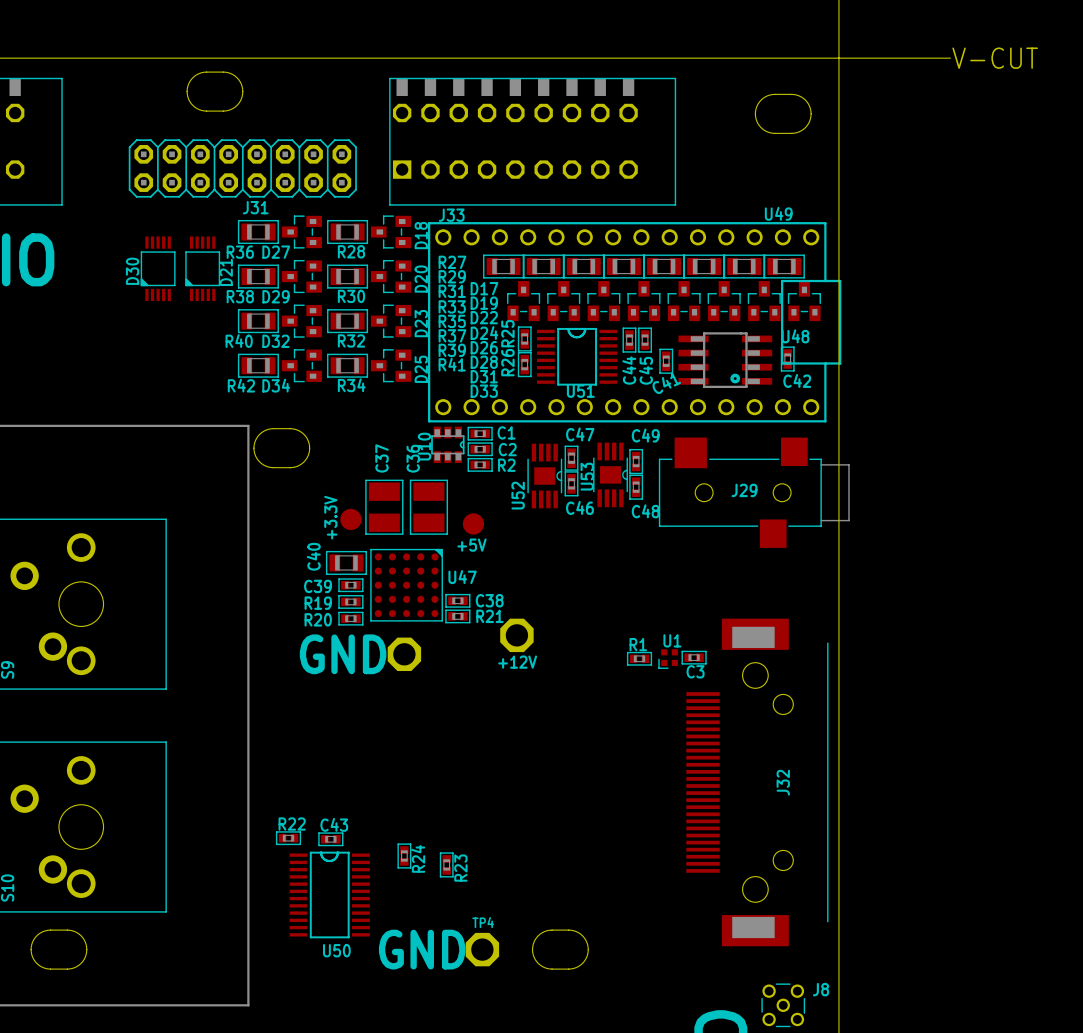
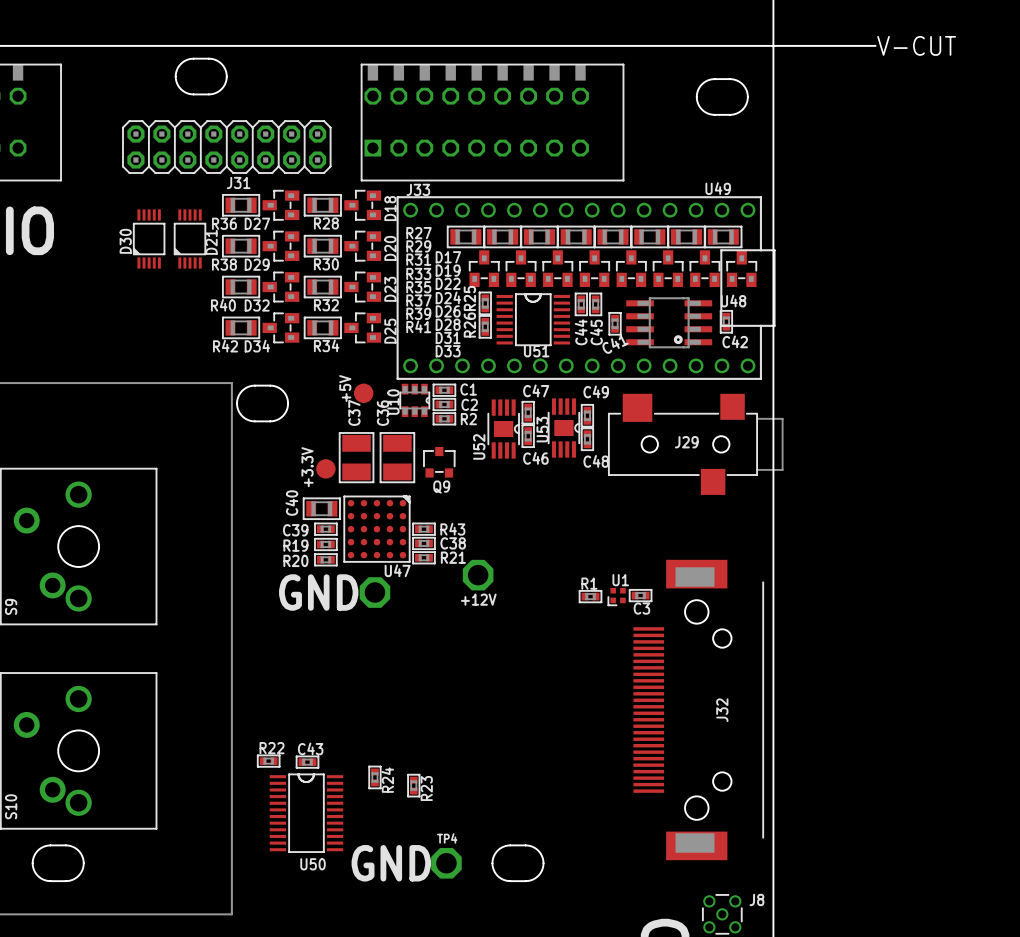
Q9: none -> (439, 462)
part position: (473, 523) -> (363, 393)
text rotation: 0° (471, 545) -> 90° counterclockwise (345, 388)
text position: +5V (471, 545) -> +5V (345, 388)
U47 name position: U47 (462, 577) -> U47 (397, 570)
R43: none -> (423, 529)

